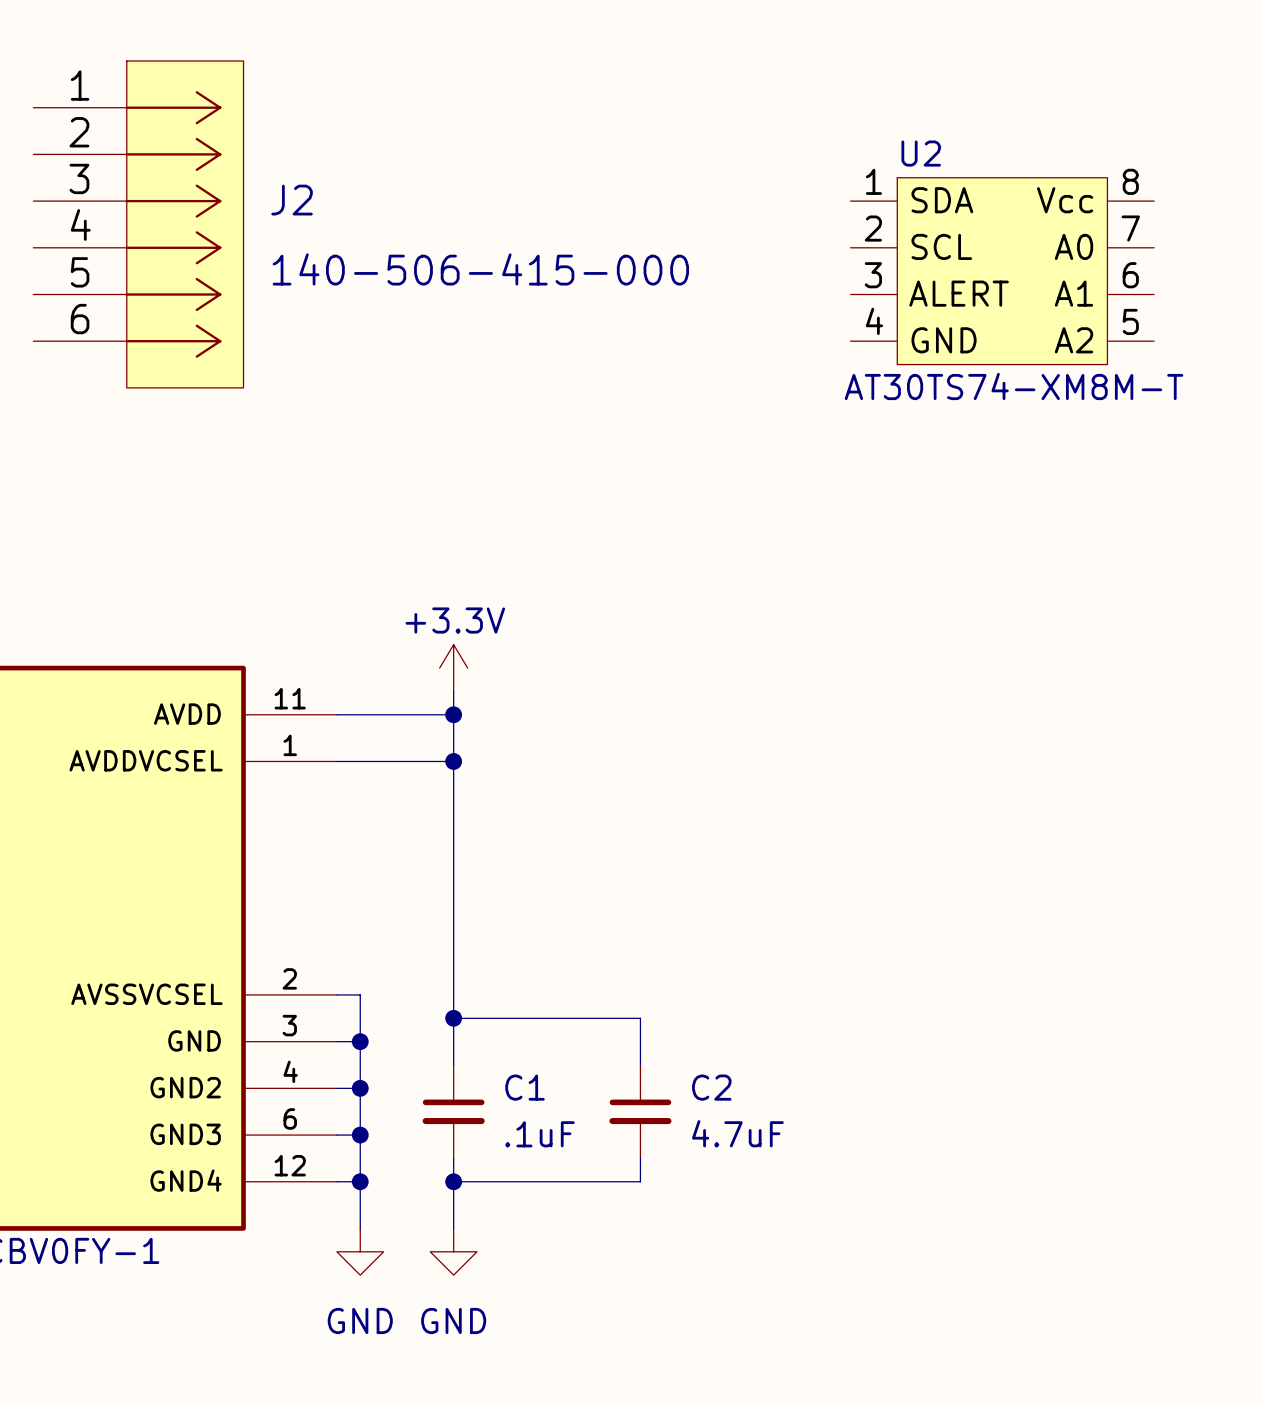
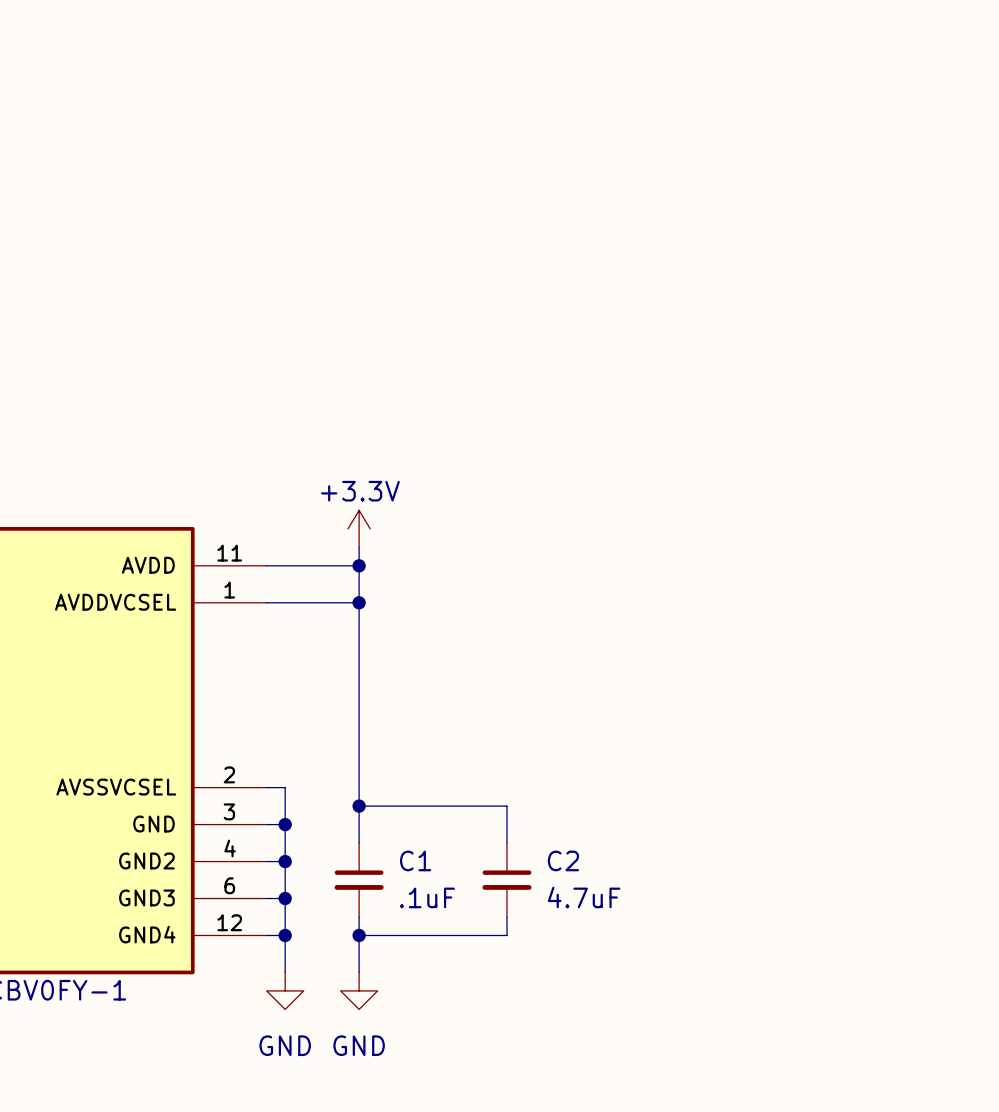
J2: 140-506-415-000 (138, 224) -> none
U2: AT30TS74-XM8M-T (1002, 271) -> none

